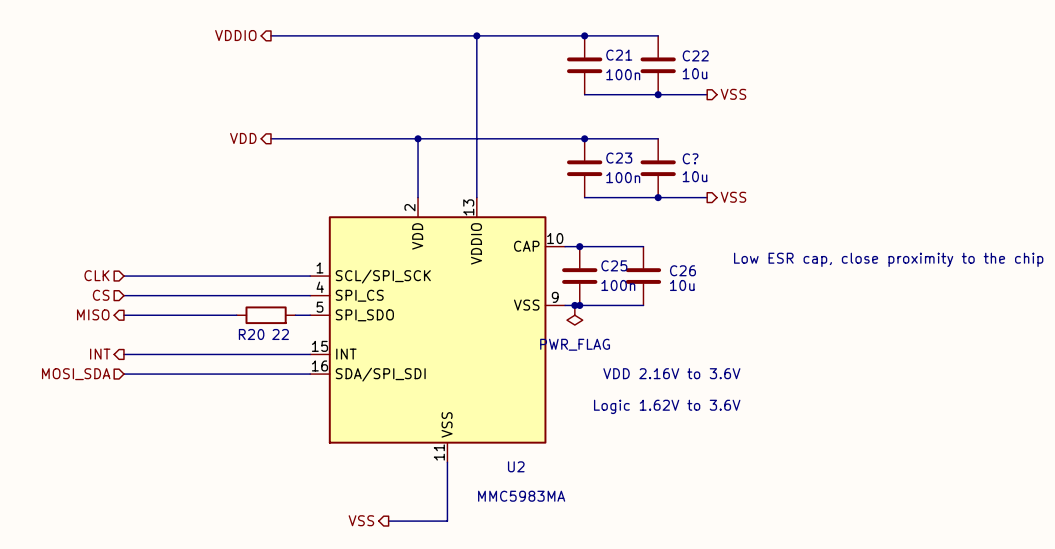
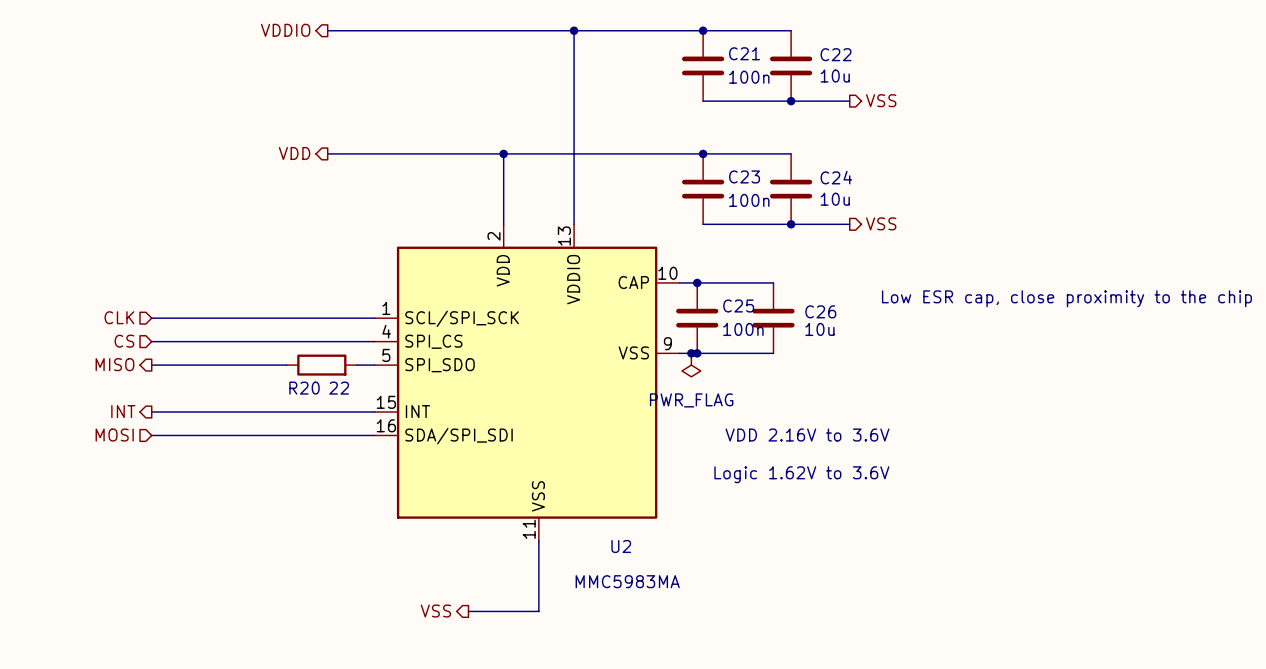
C? name: C? (690, 158) -> C24 (836, 177)
hierarchical label: MOSI_SDA (76, 374) -> MOSI (114, 435)

